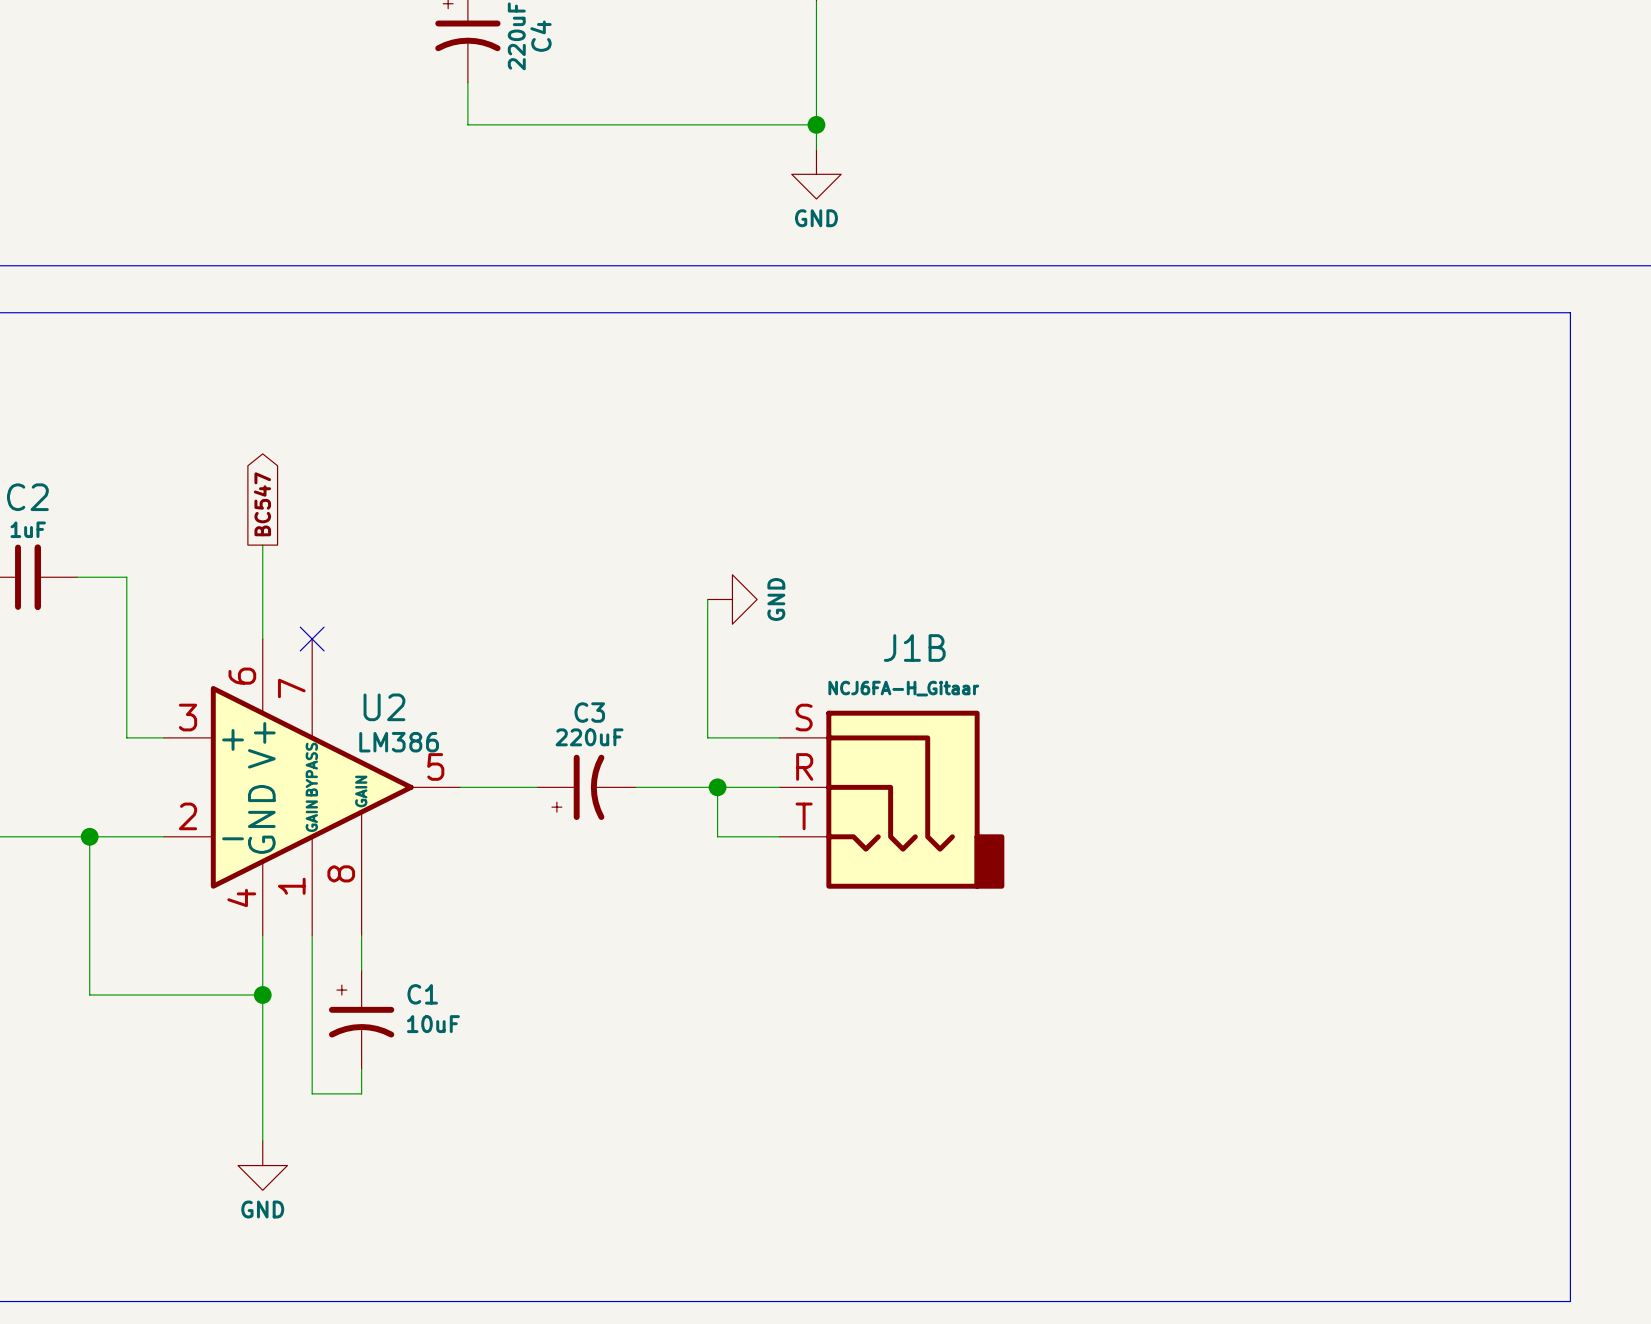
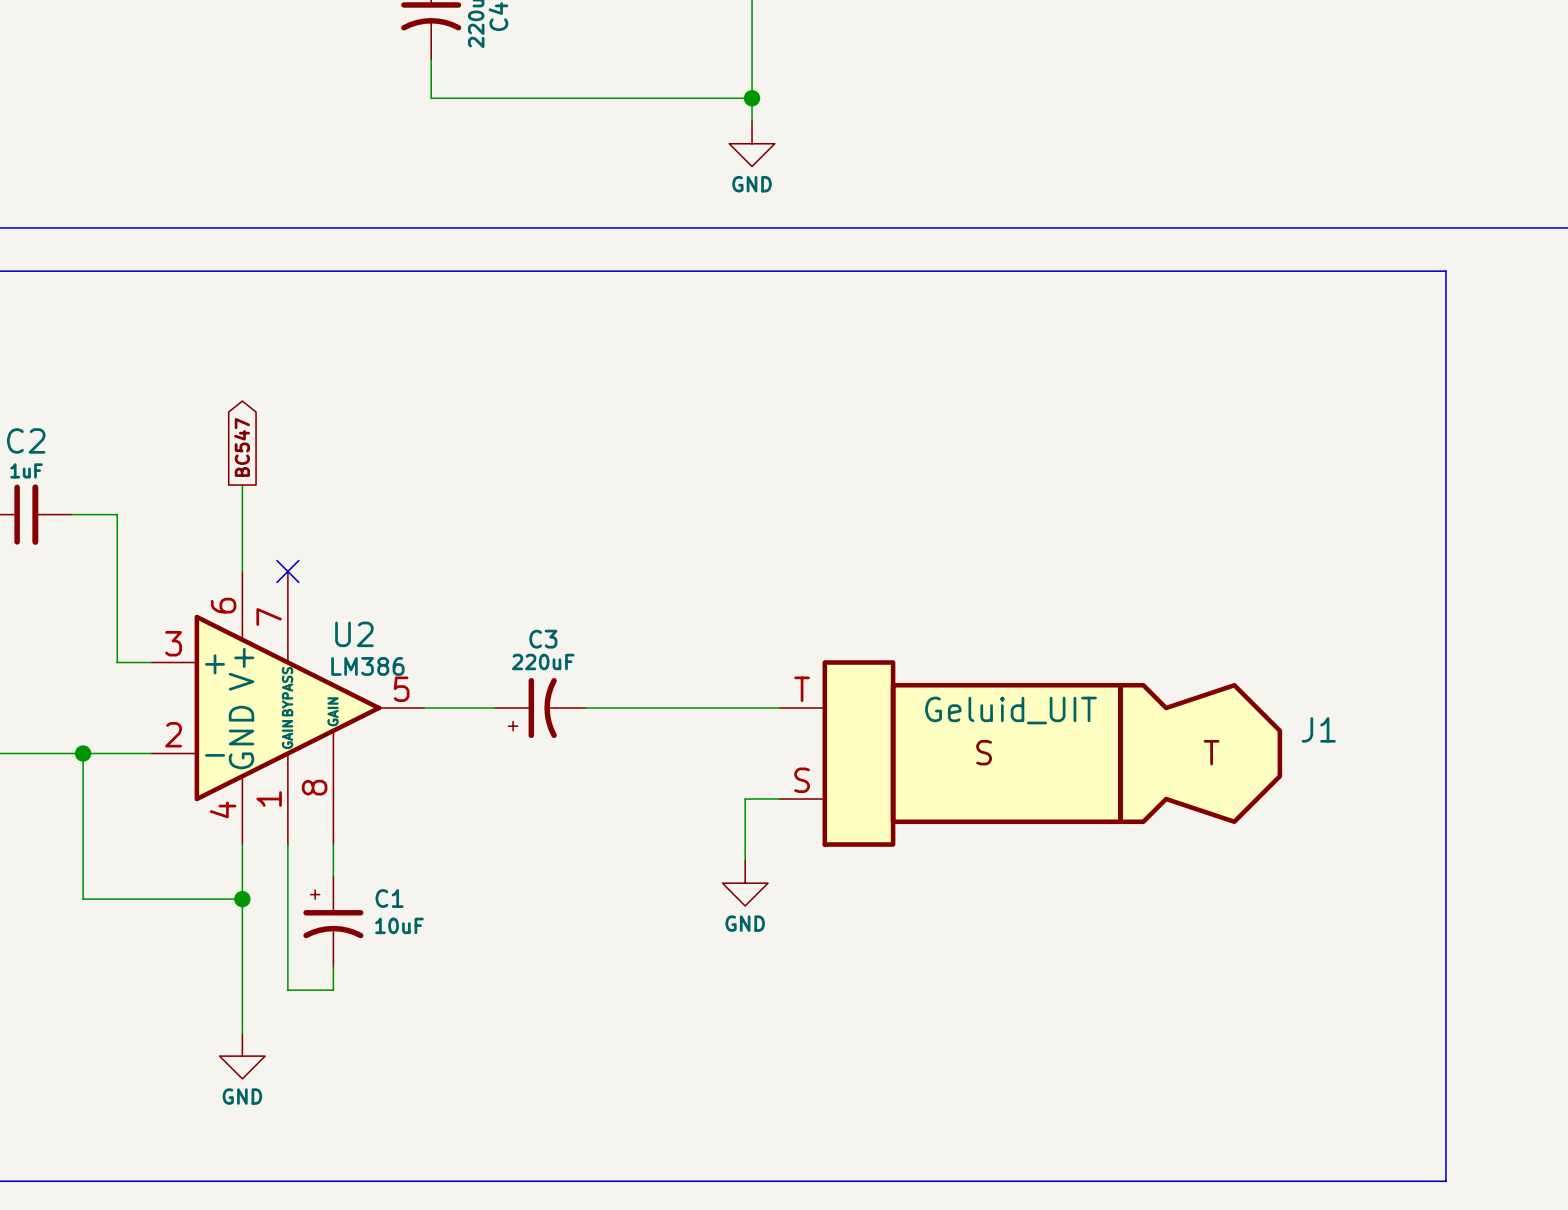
wire: (707, 599) (707, 737) (779, 737) -> none
power symbol rotation: 0° (732, 599) -> 90° clockwise (745, 883)
power symbol position: GND (732, 599) -> GND (745, 883)
wire: (717, 787) (717, 836) (779, 836) -> none
junction: (717, 787) -> none
J1B: NCJ6FA-H_Gitaar (891, 799) -> none
J1: none -> Geluid_UIT (1030, 753)
wire: none -> (779, 799) (745, 799) (745, 860)

